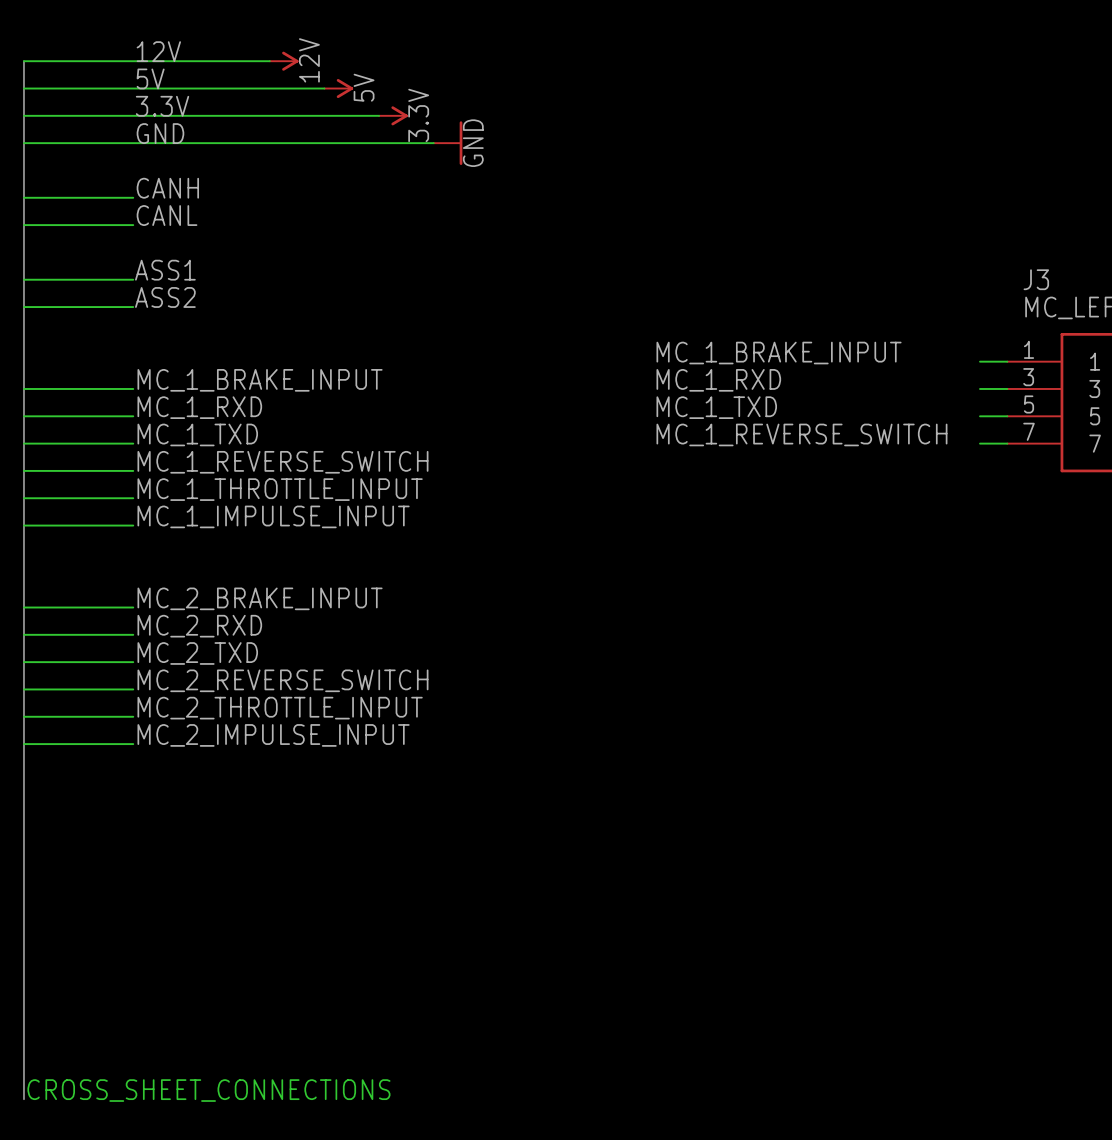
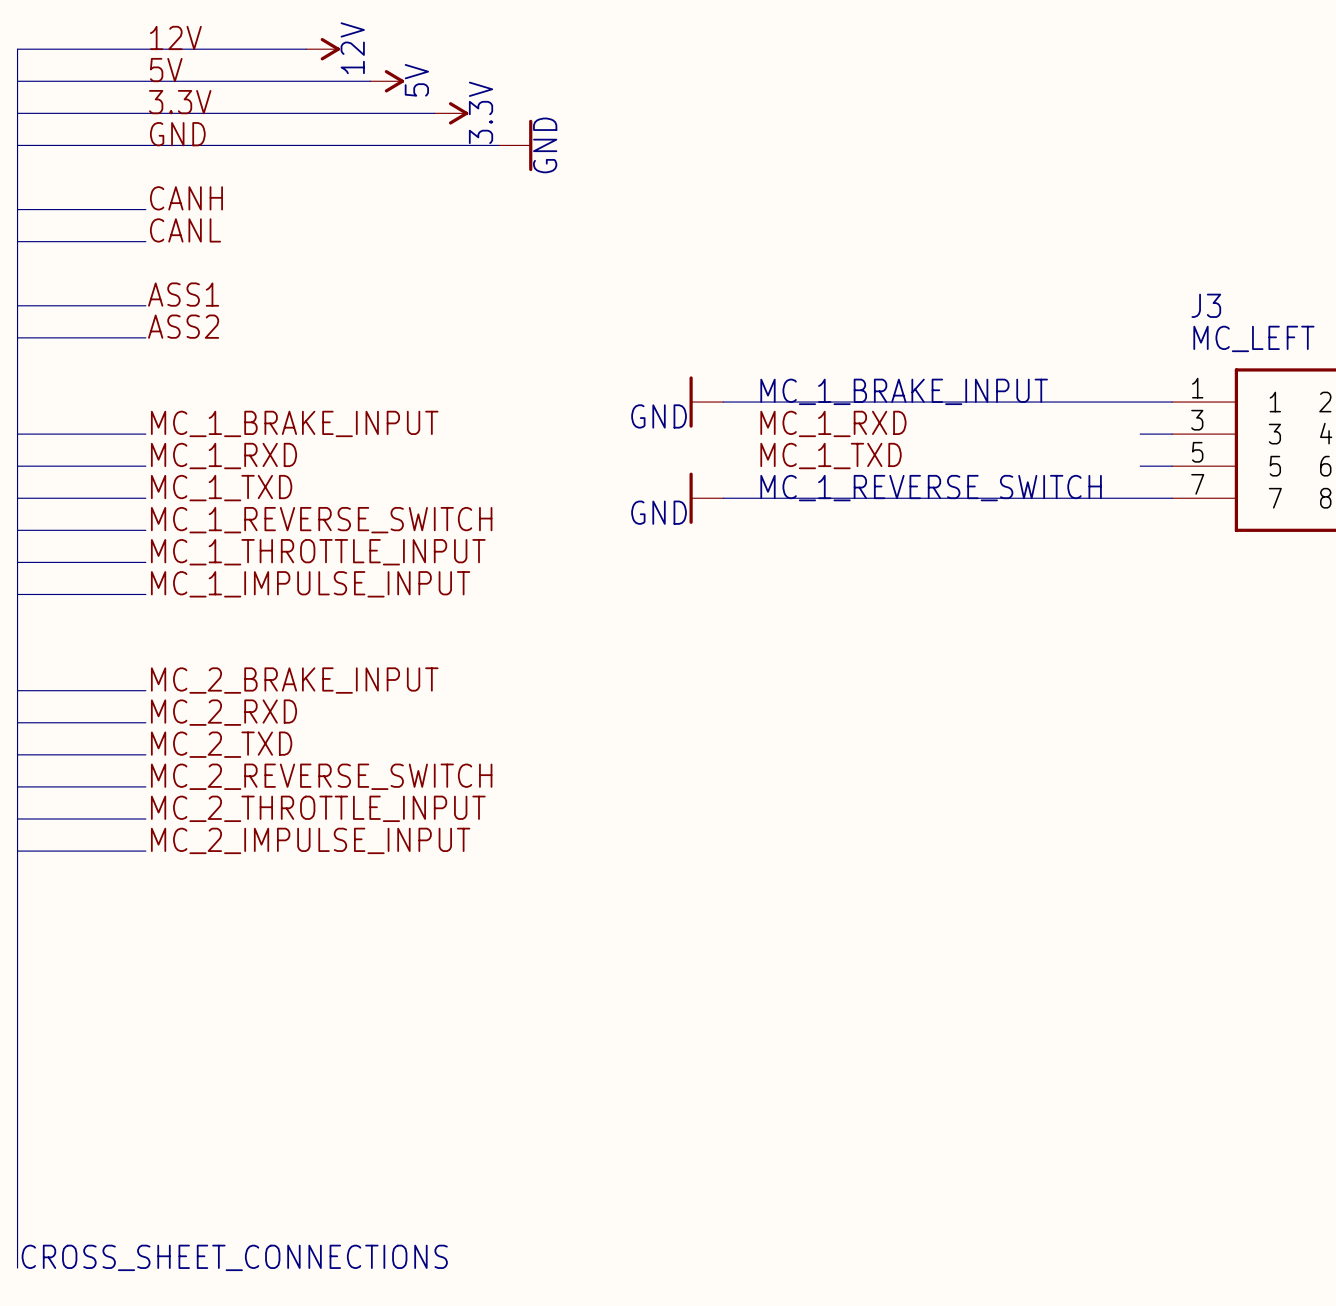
label: MC_1_BRAKE_INPUT (779, 353) -> none
text: none -> MC_1_BRAKE_INPUT (904, 391)
power symbol: none -> GND (706, 402)
wire: none -> (723, 402) (1140, 402)
label: MC_1_REVERSE_SWITCH (801, 434) -> none
text: none -> MC_1_REVERSE_SWITCH (931, 488)
power symbol: none -> GND (706, 498)
wire: none -> (723, 498) (1140, 498)

